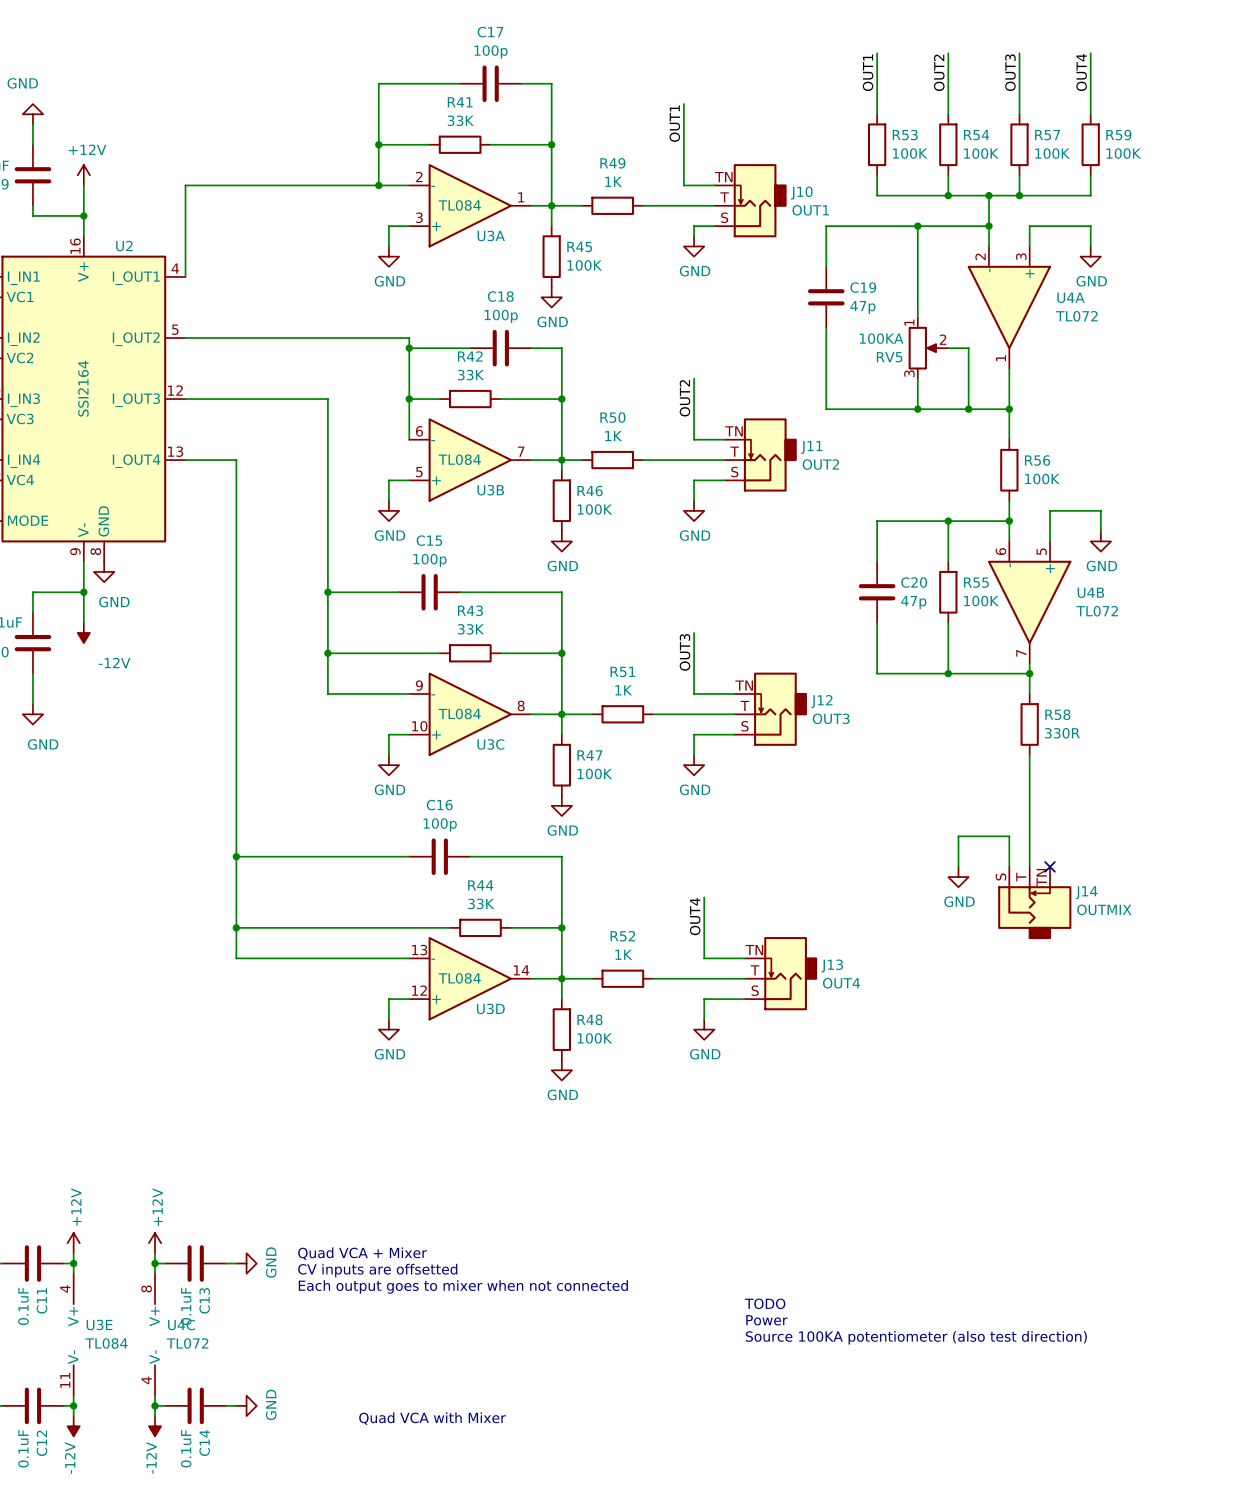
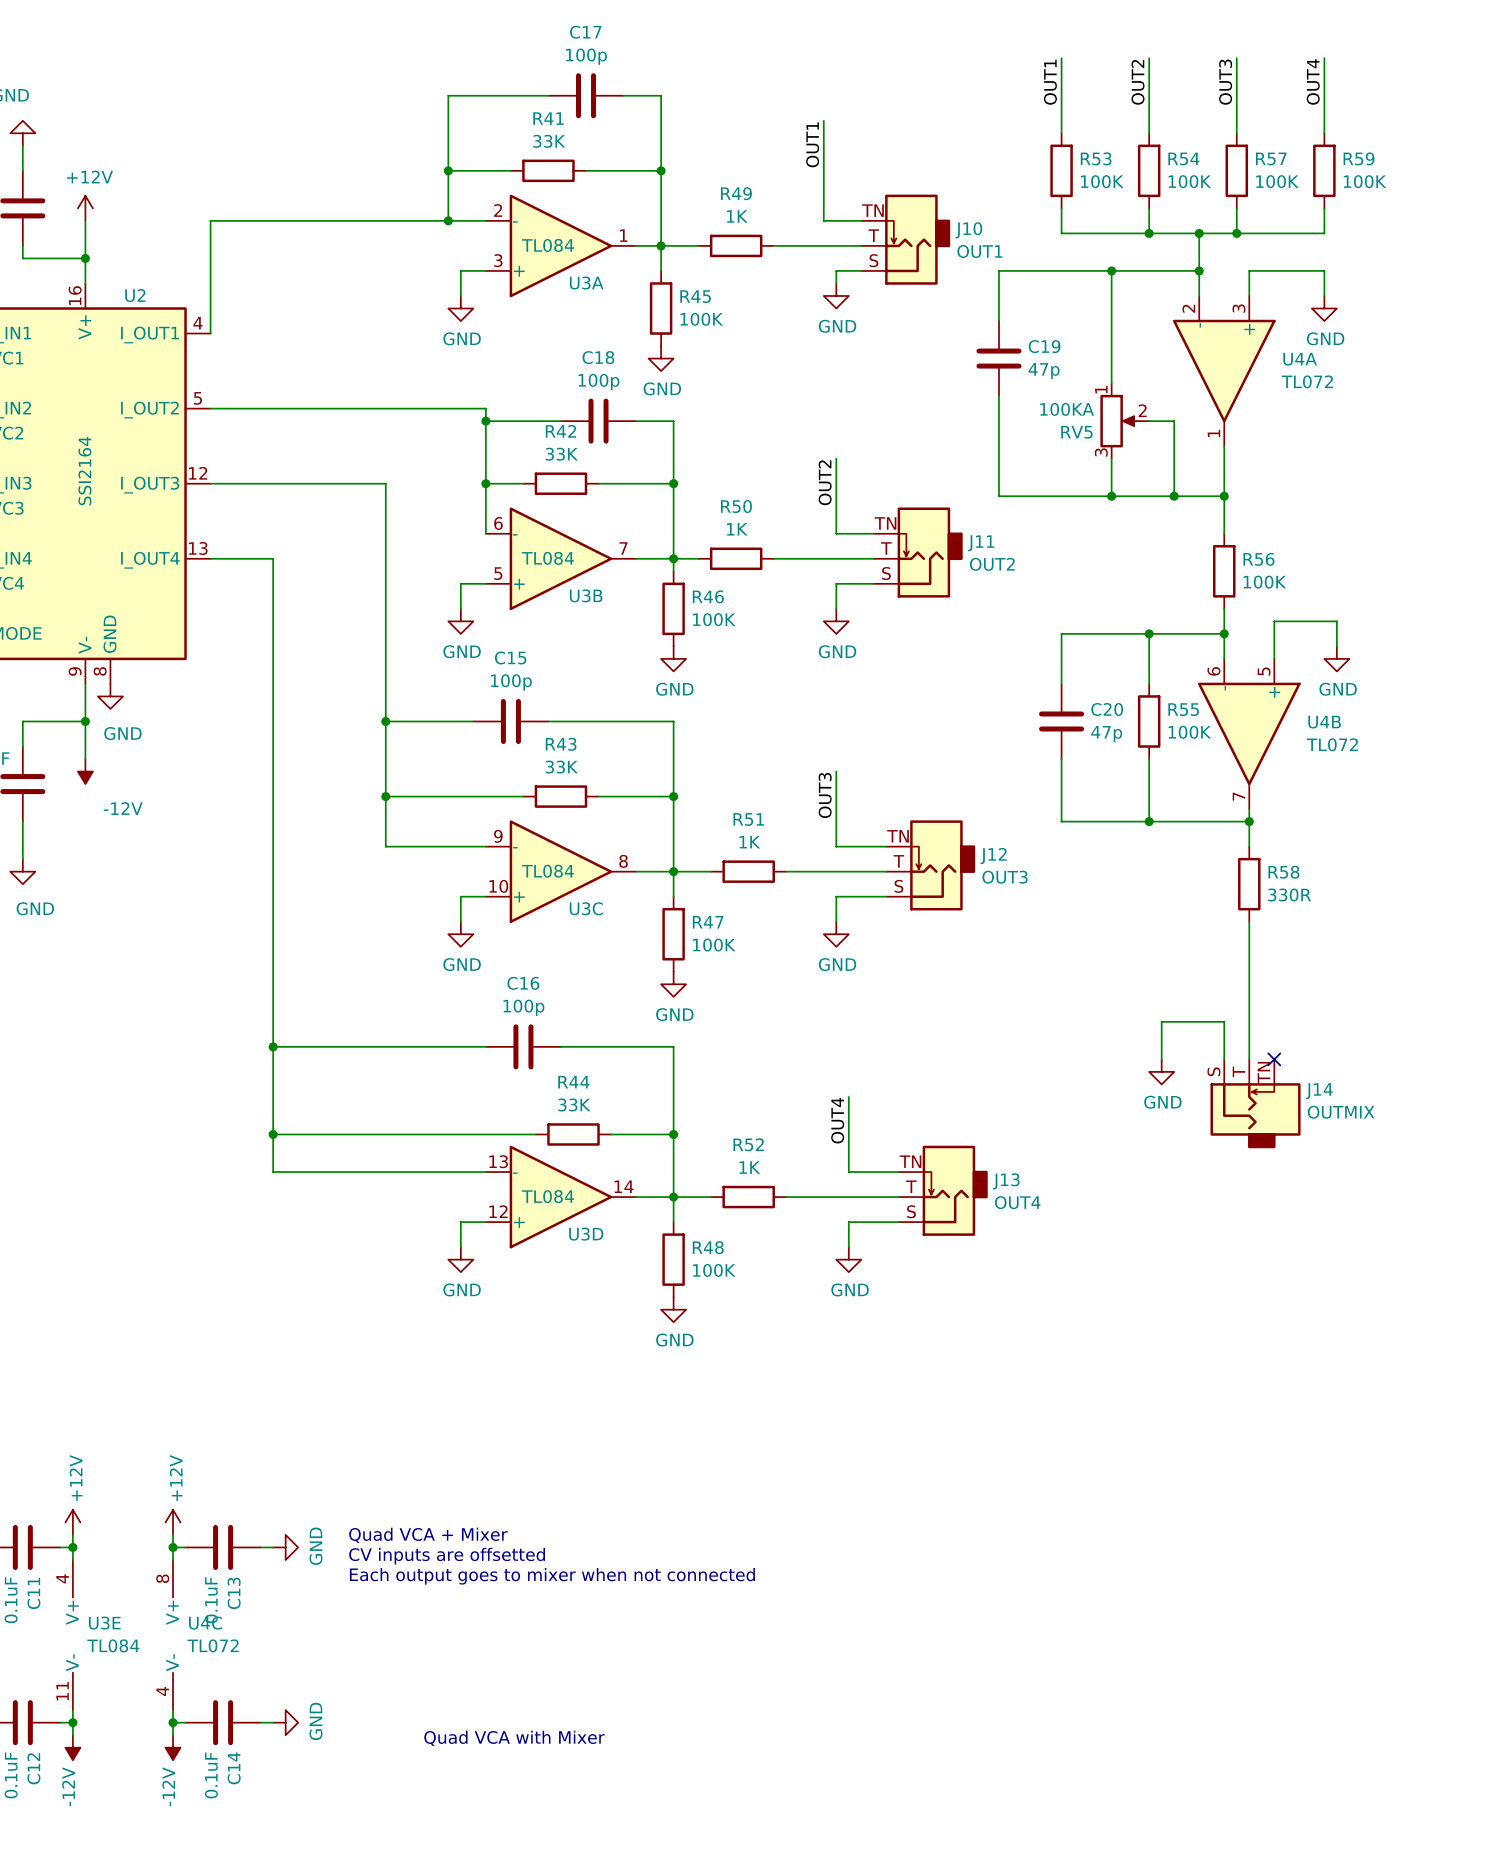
text: TODO (765, 1303) -> none
text: Power (766, 1320) -> none
text: Source 100KA potentiometer (also test direction) (916, 1337) -> none

